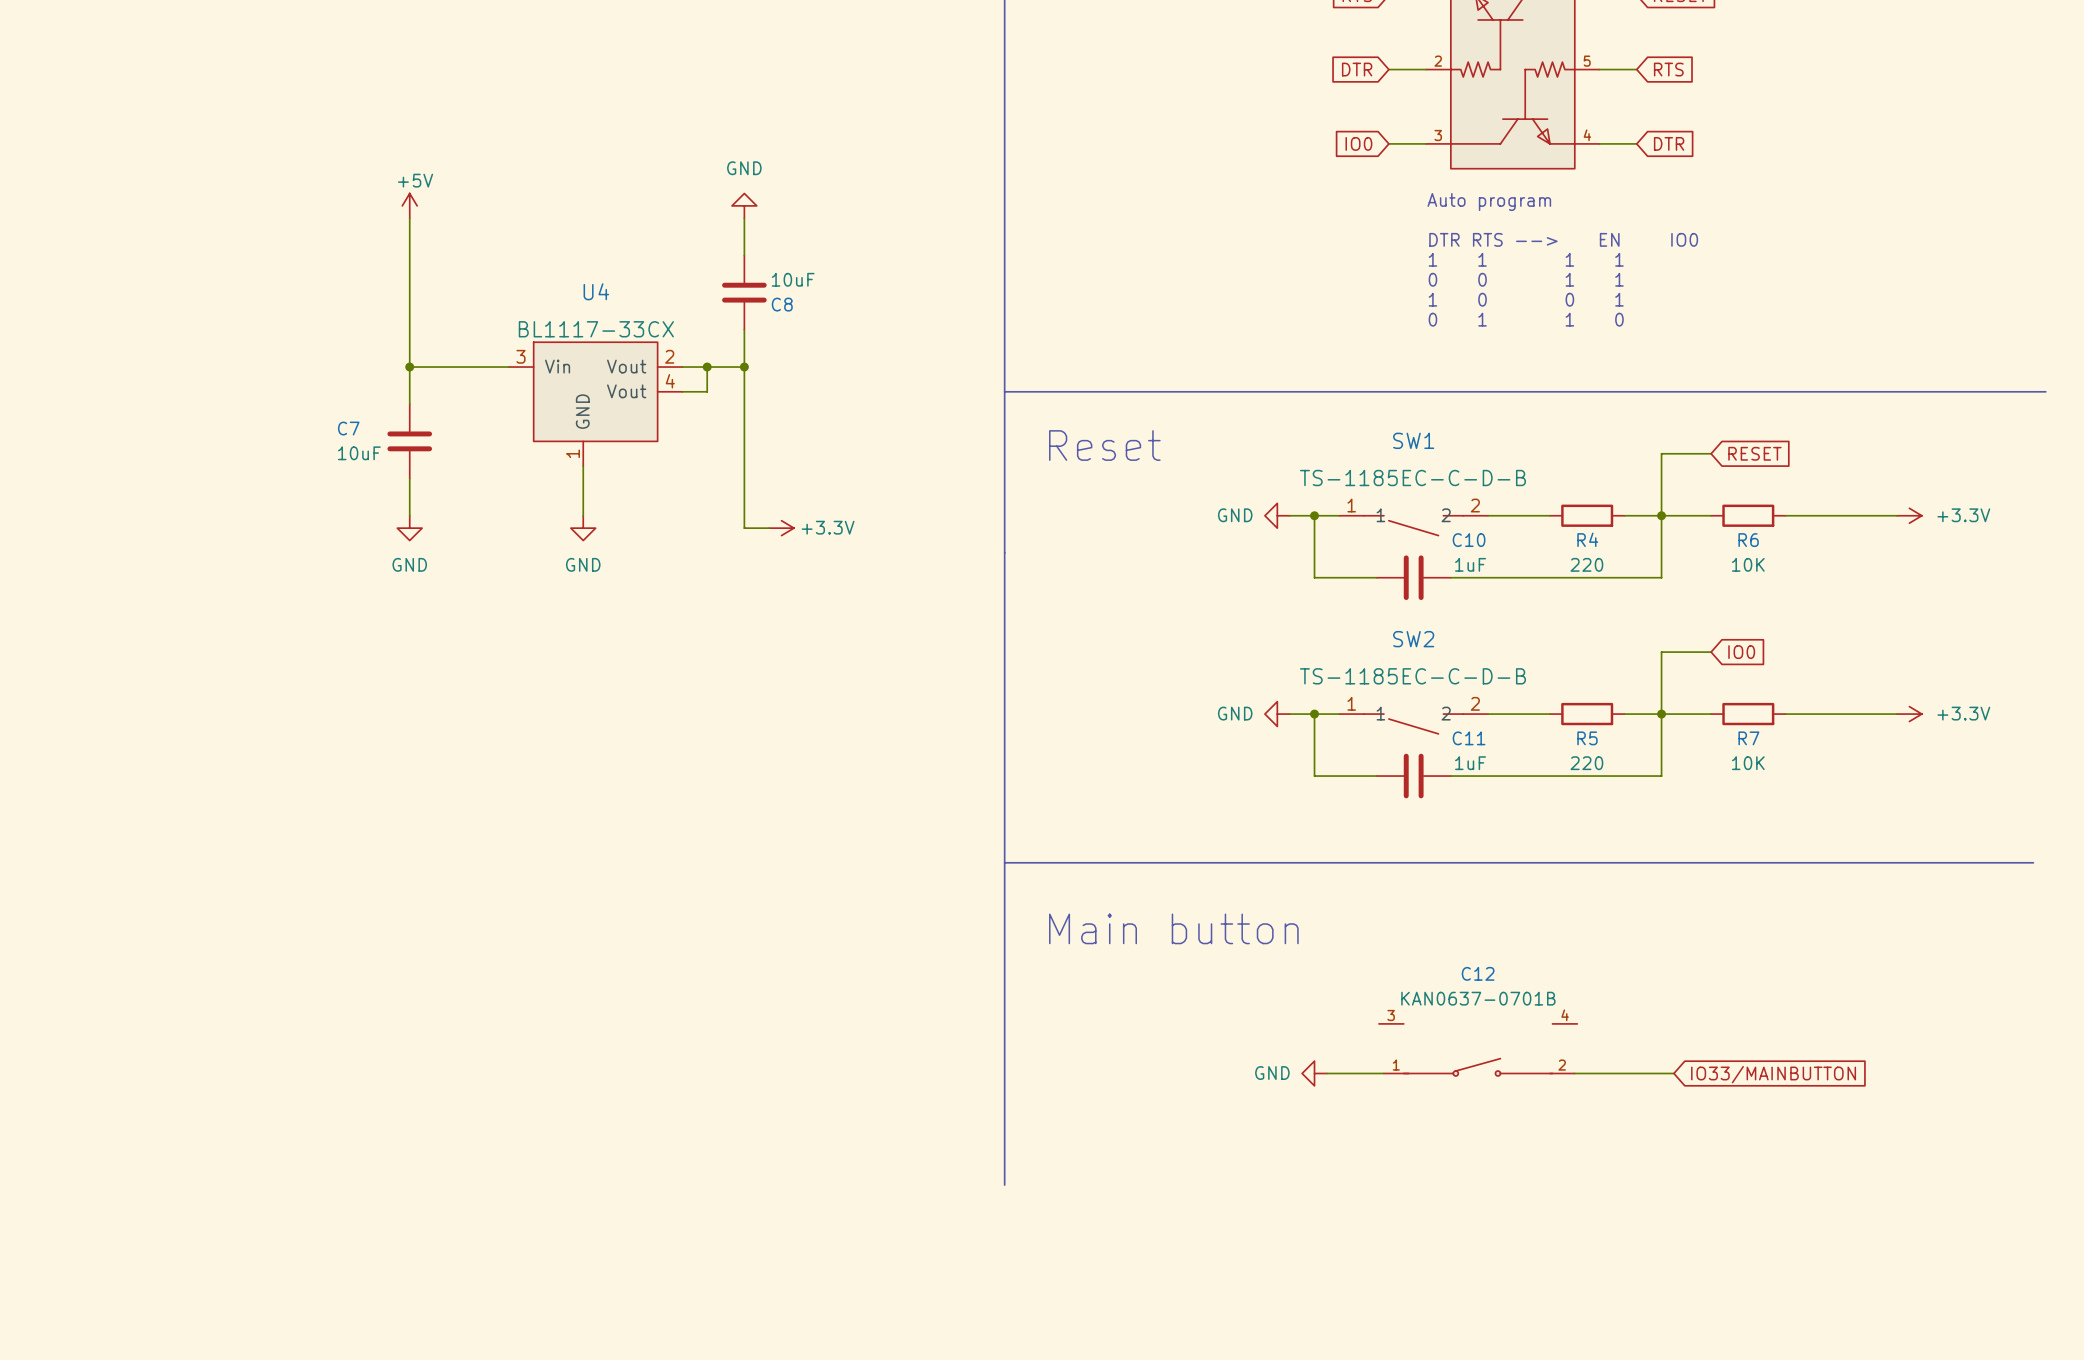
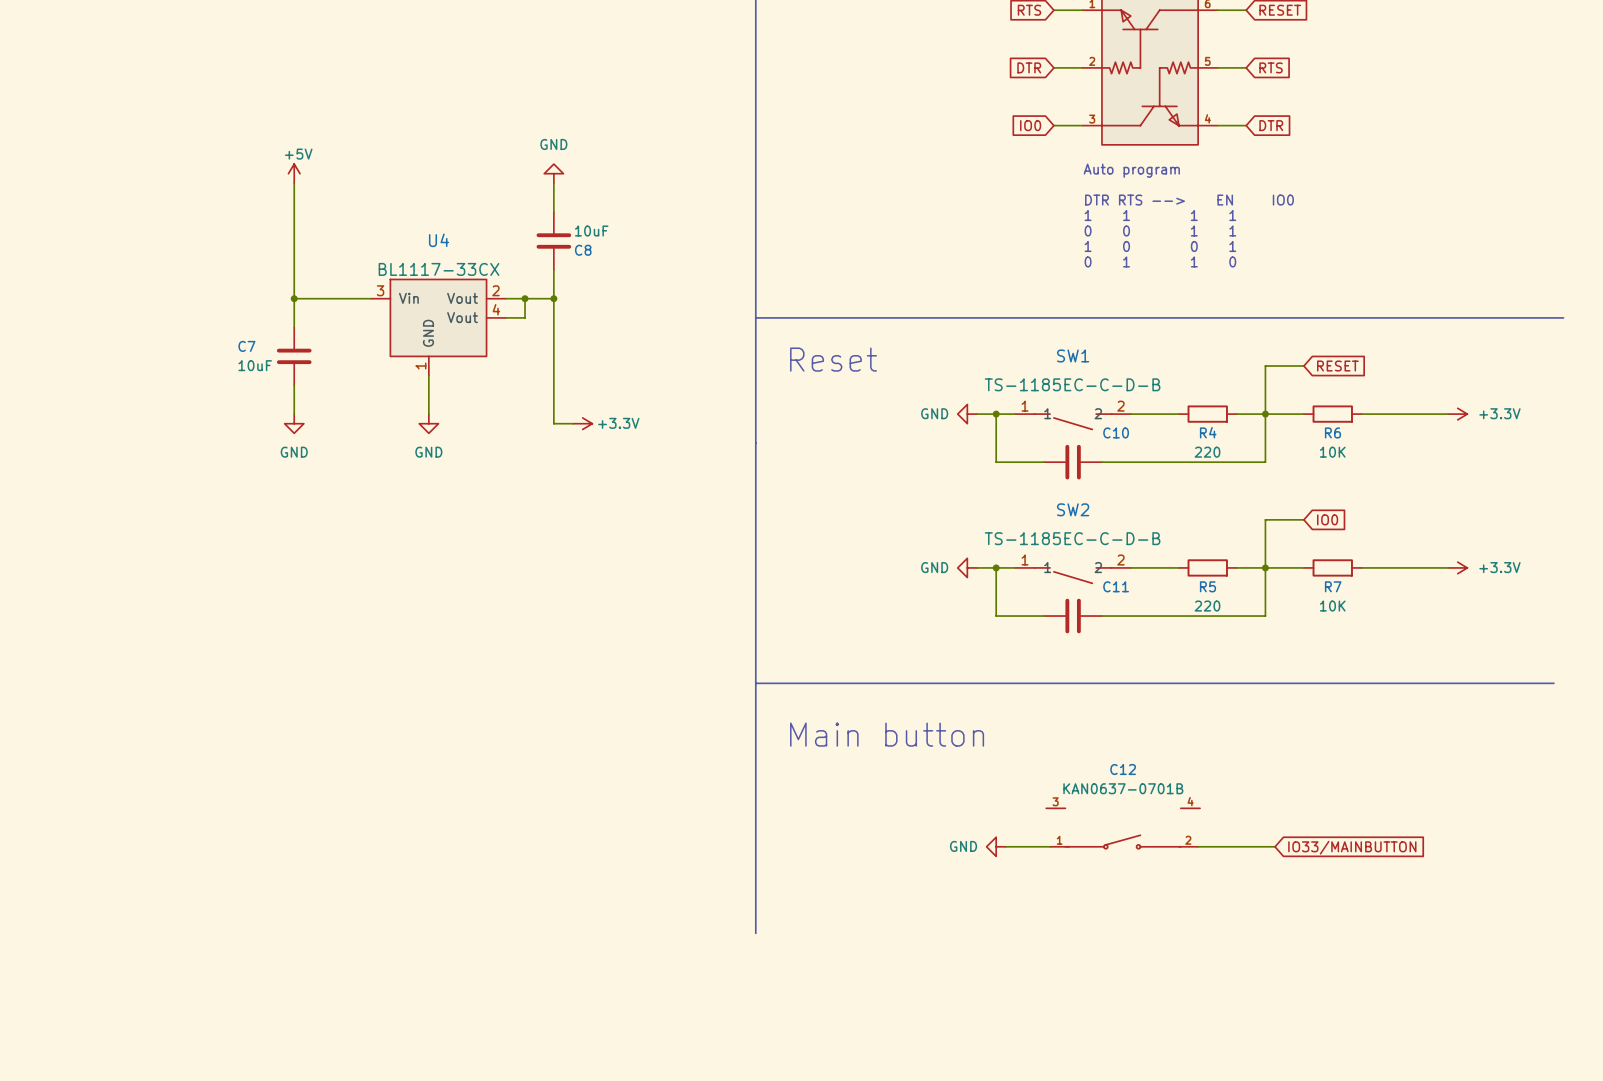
C10 value: 1uF (1470, 564) -> none
C11 value: 1uF (1470, 763) -> none

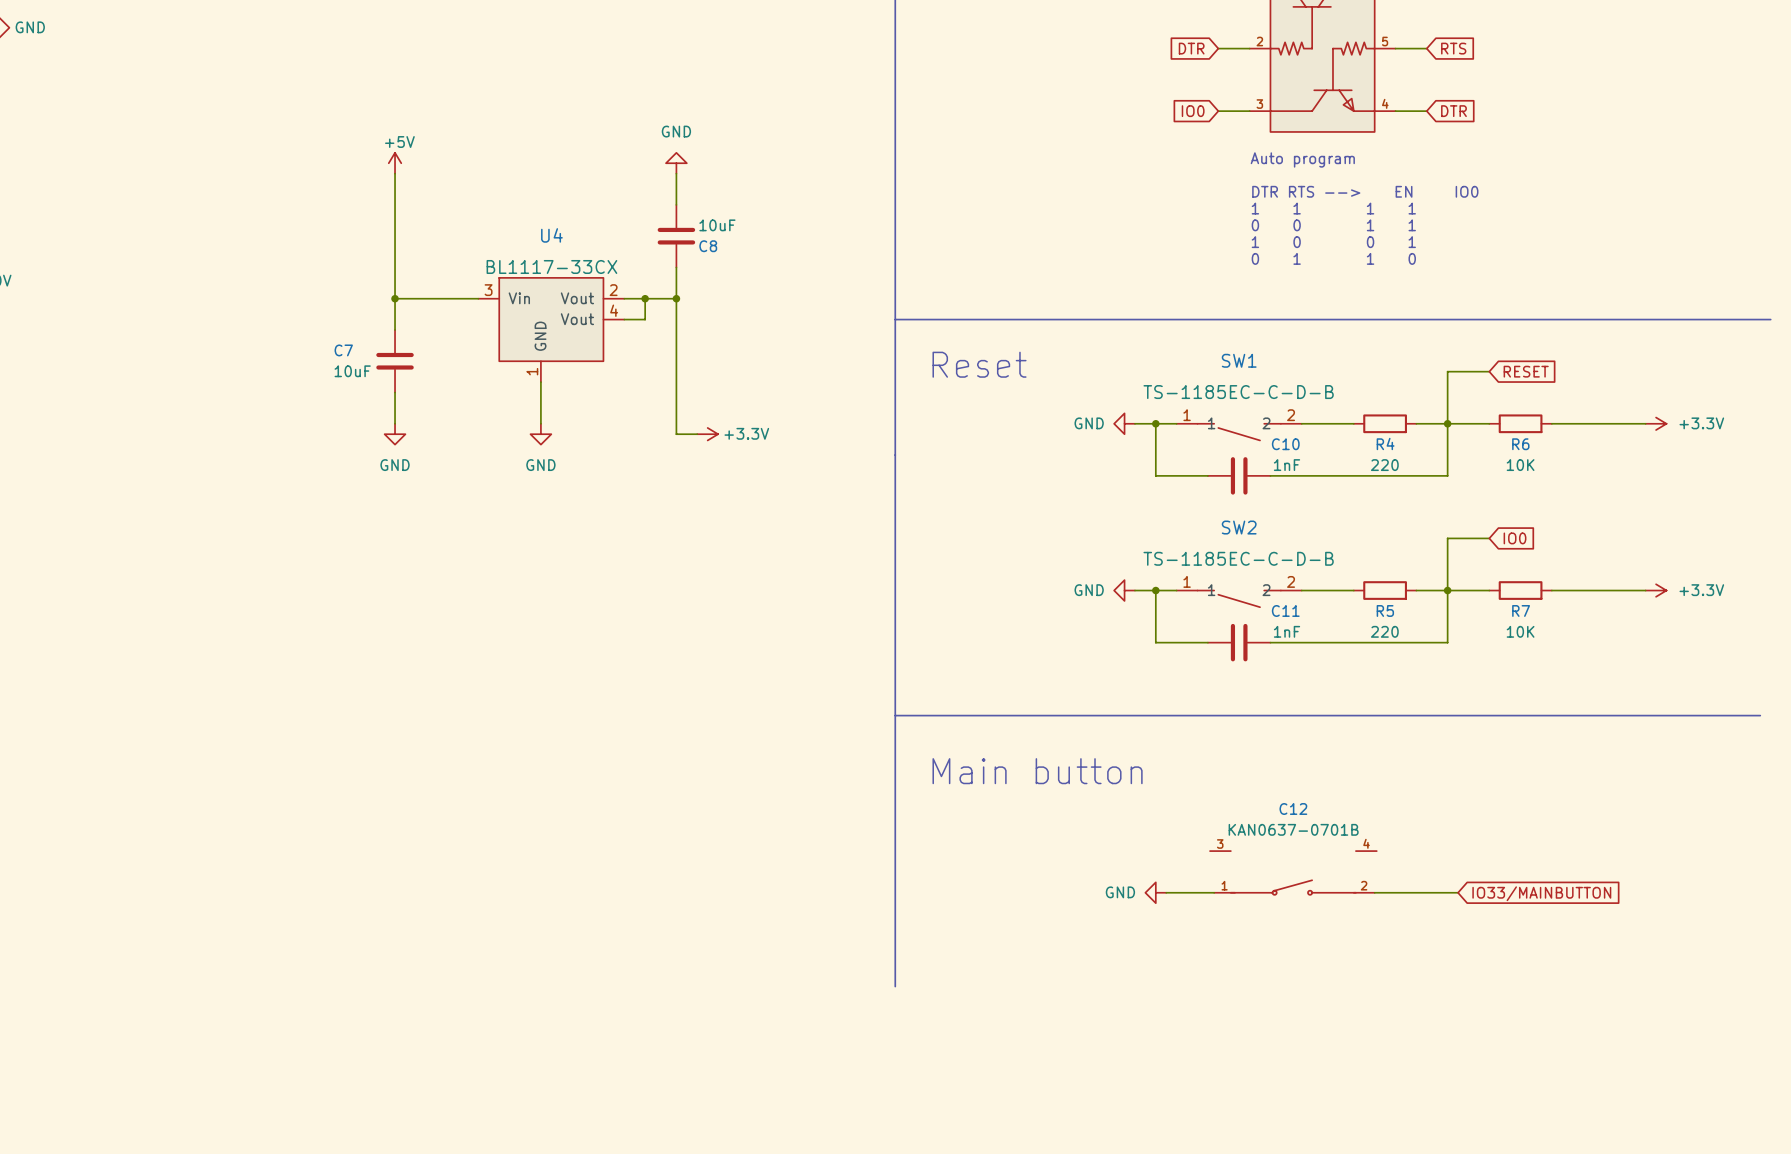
C10 value: none -> 1nF (1287, 465)
C11 value: none -> 1nF (1287, 631)

